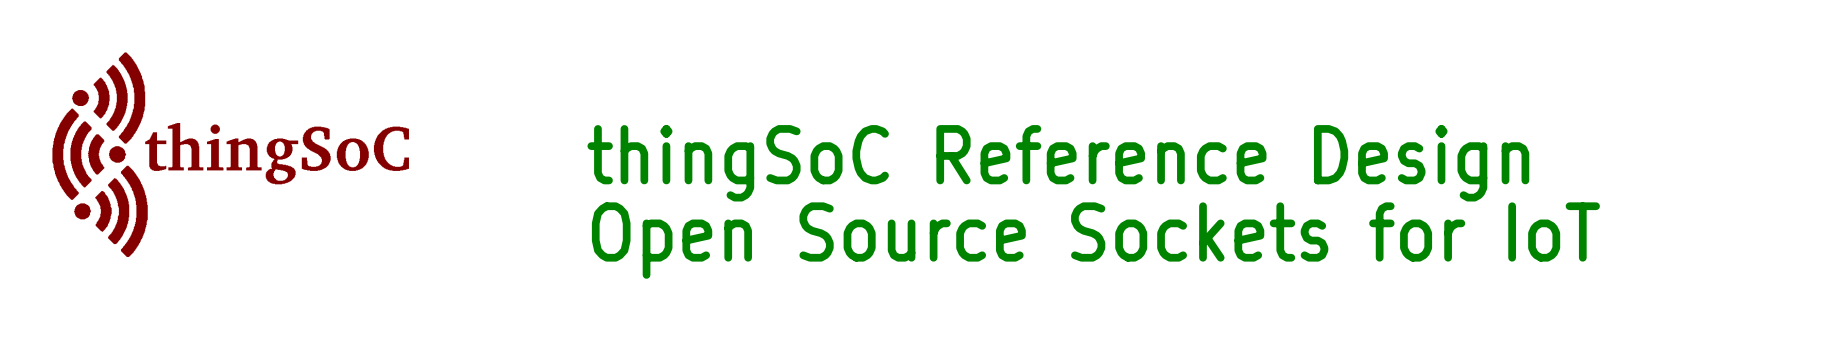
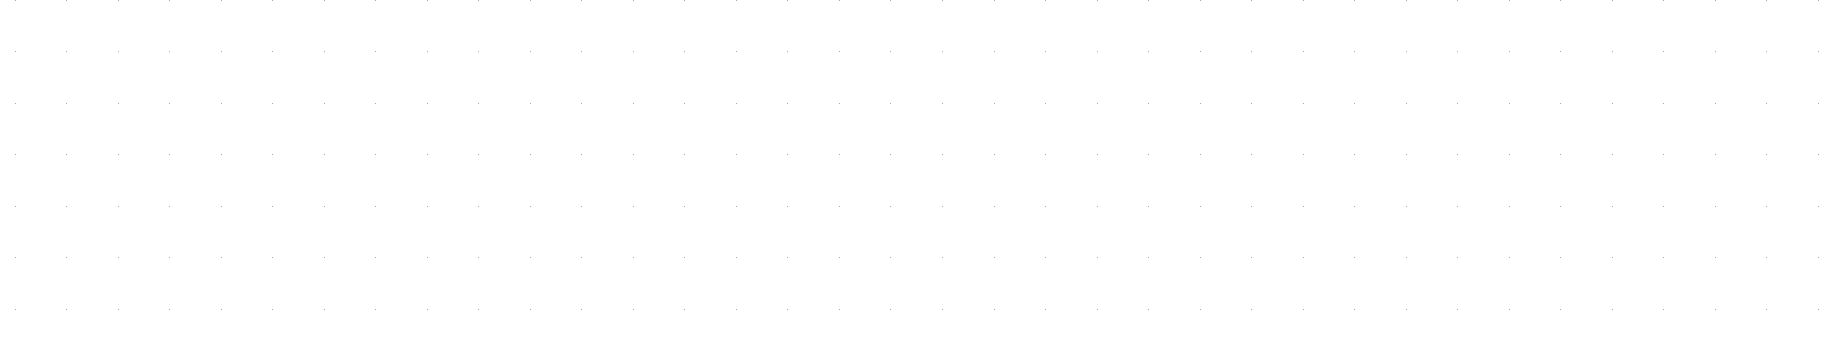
part: (230, 154) -> none
text: thingSoC Reference Design (1058, 163) -> none
text: Open Source Sockets for IoT (1095, 240) -> none

